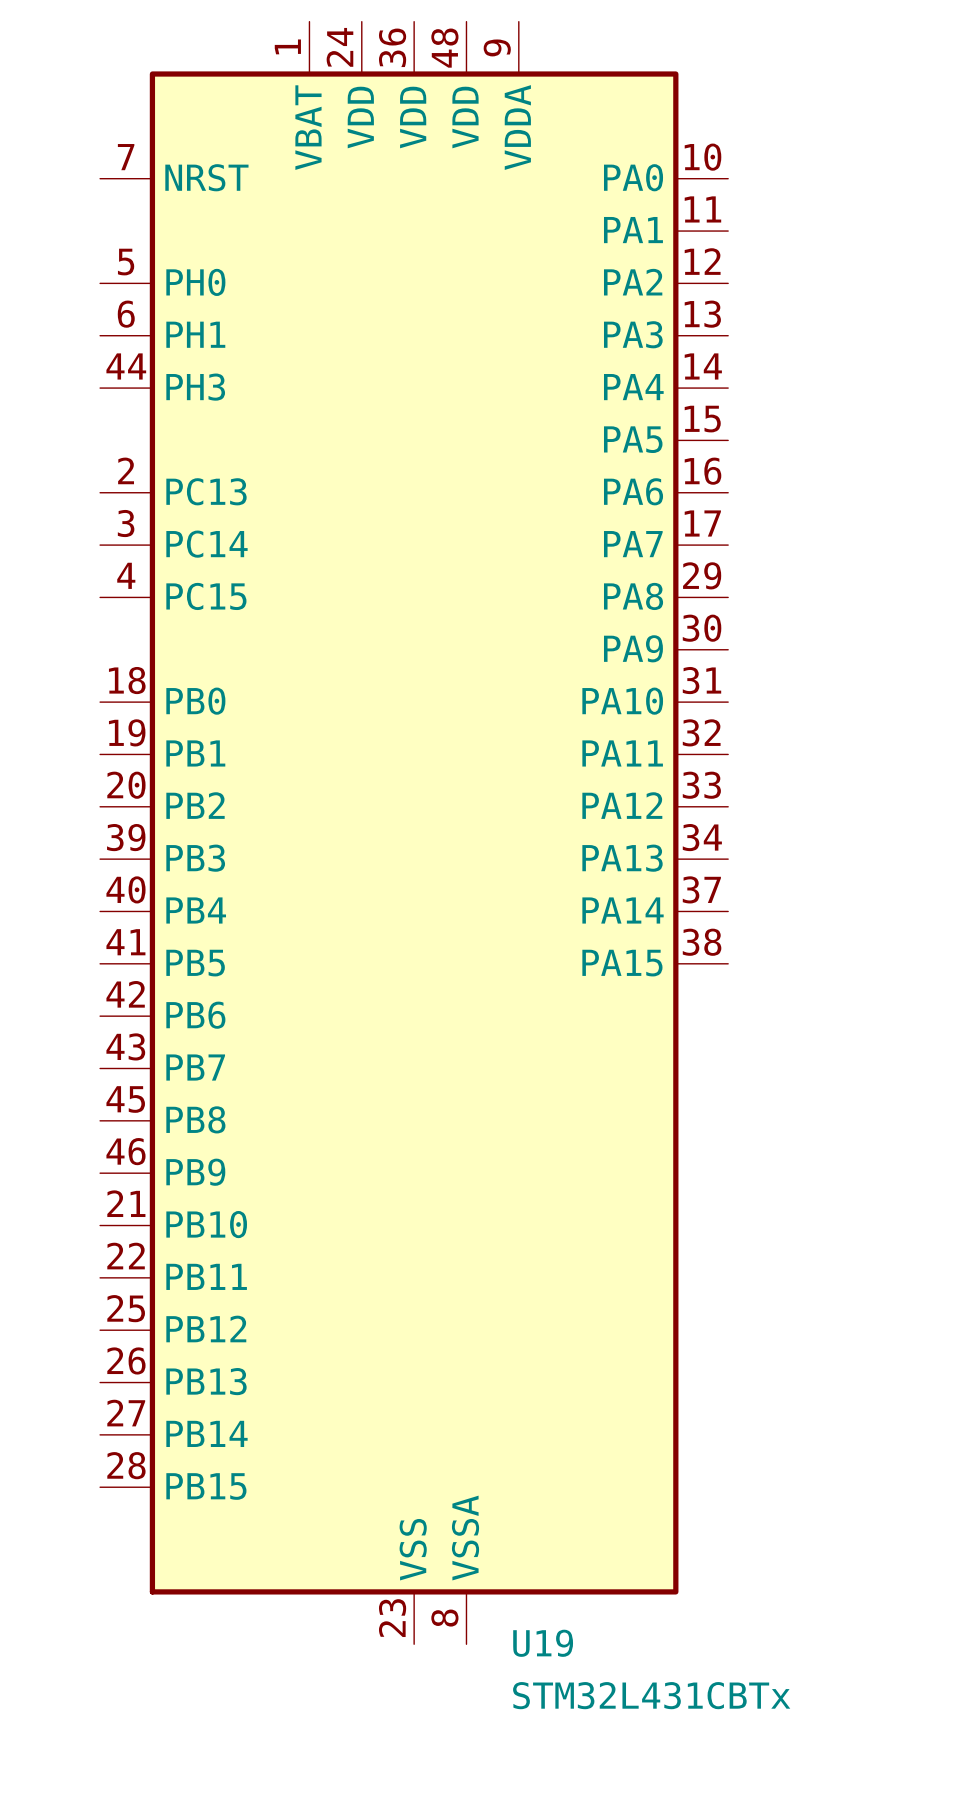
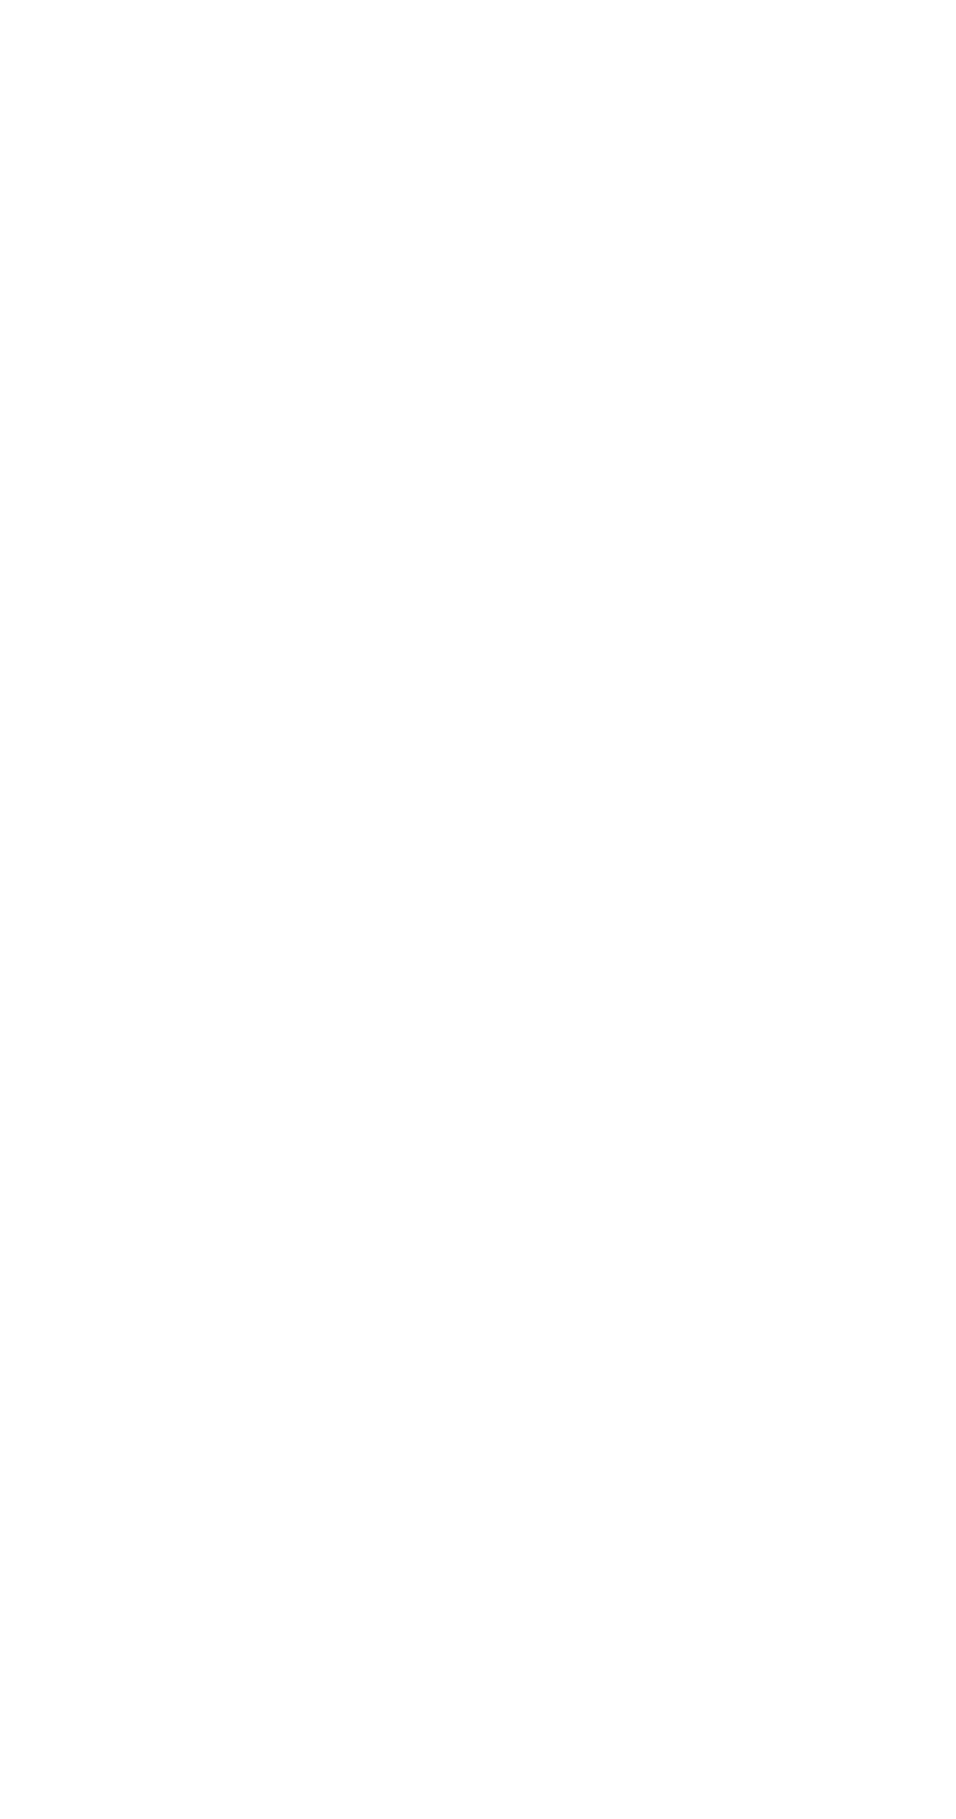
U19: STM32L431CBTx (414, 832) -> none

